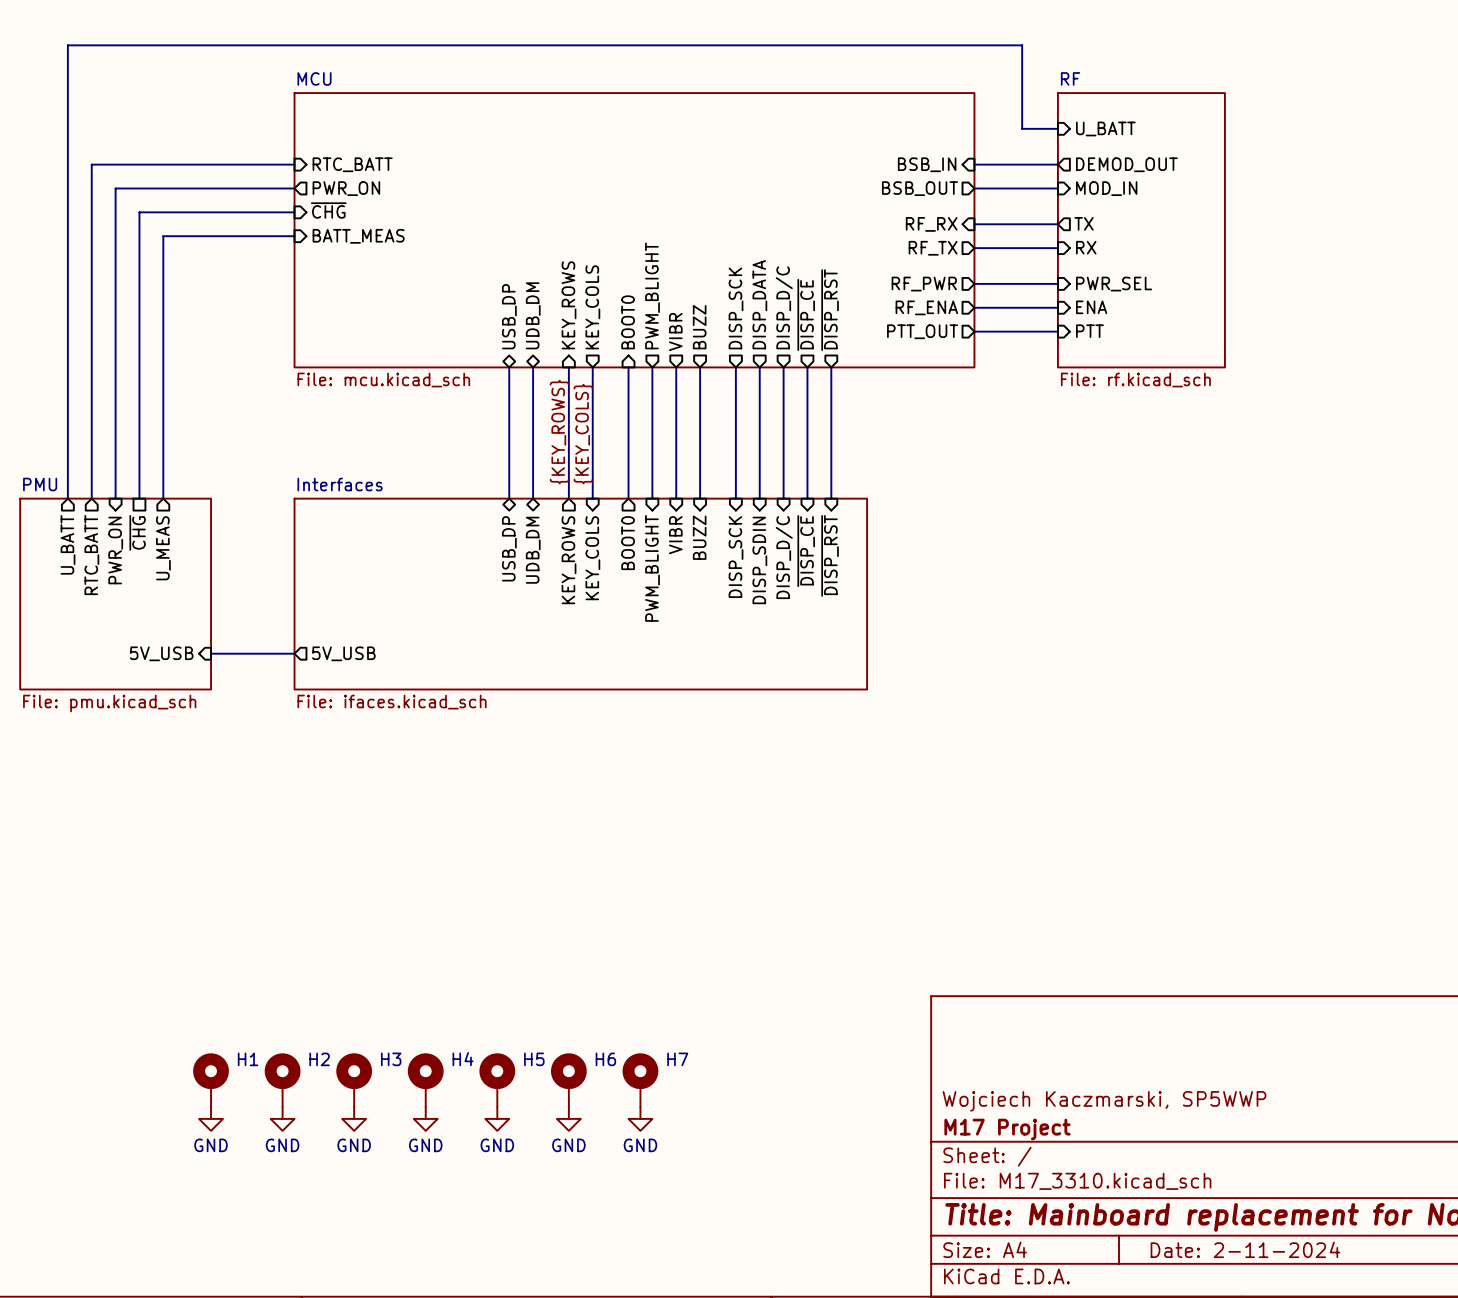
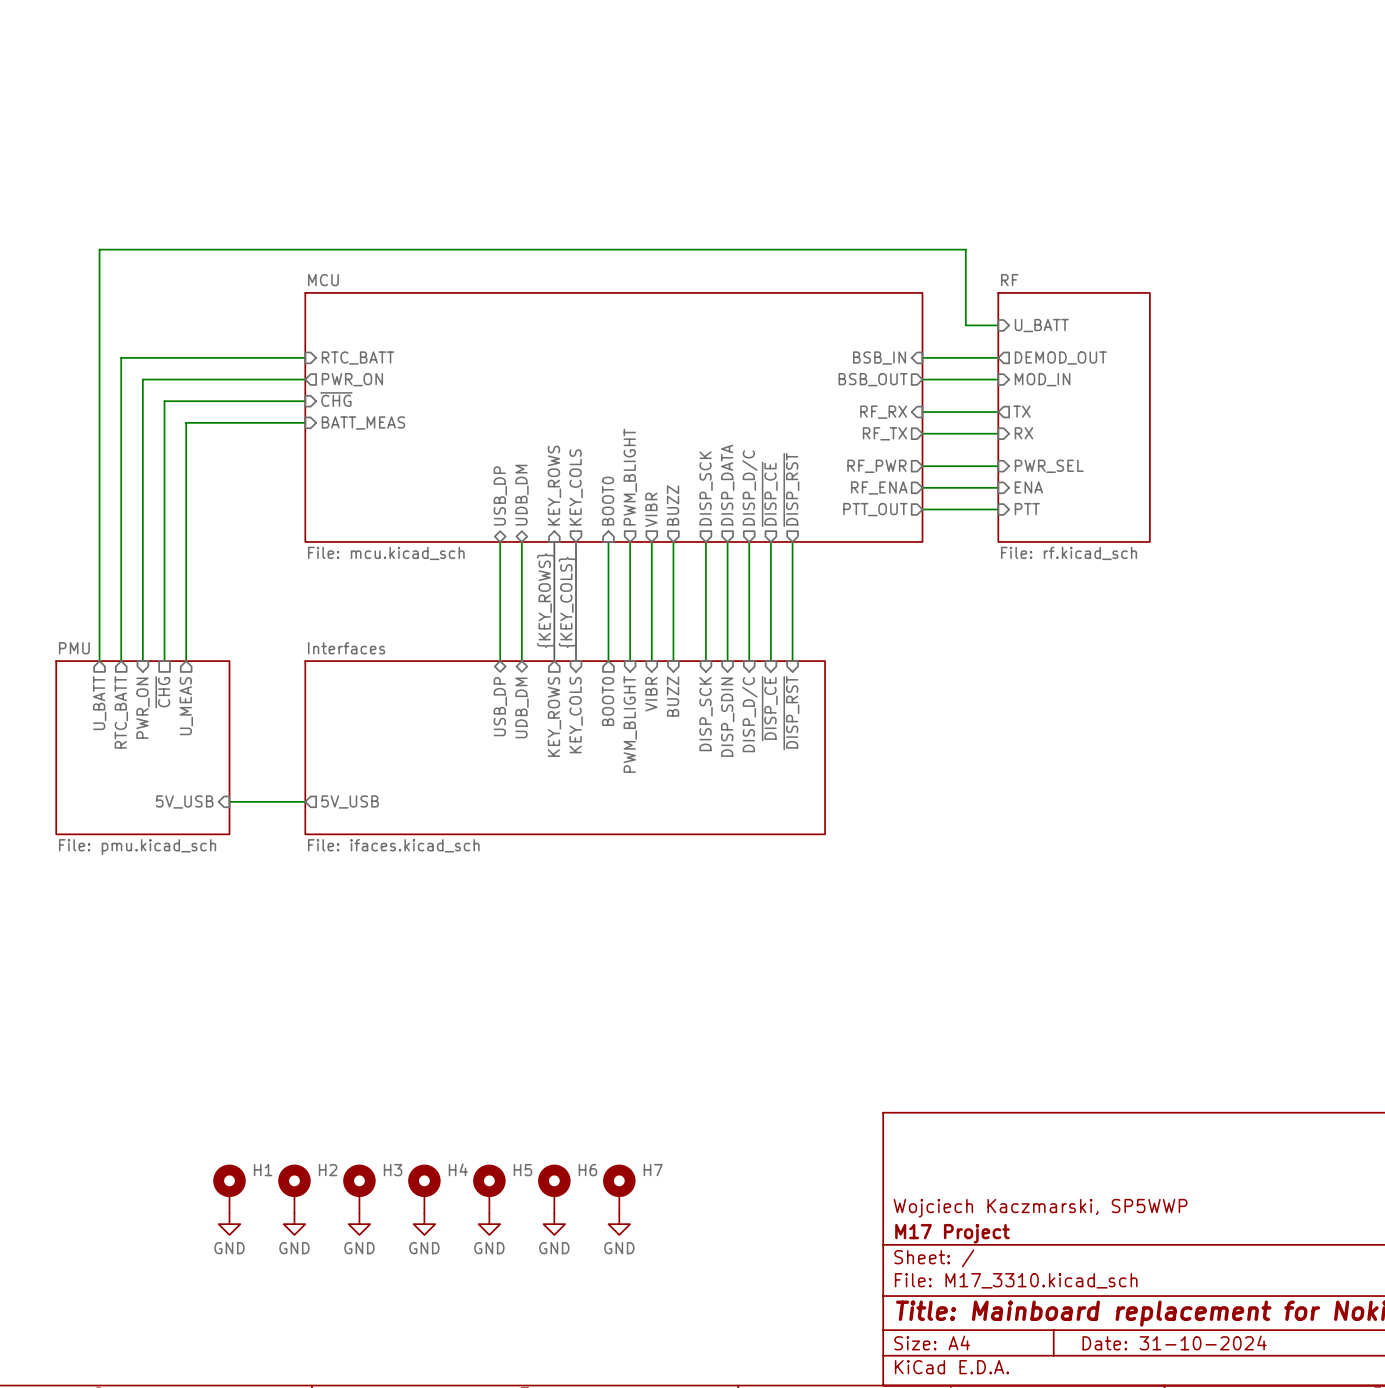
title block: Date: 2-11-2024 (1245, 1249) -> Date: 31-10-2024 (1174, 1342)

